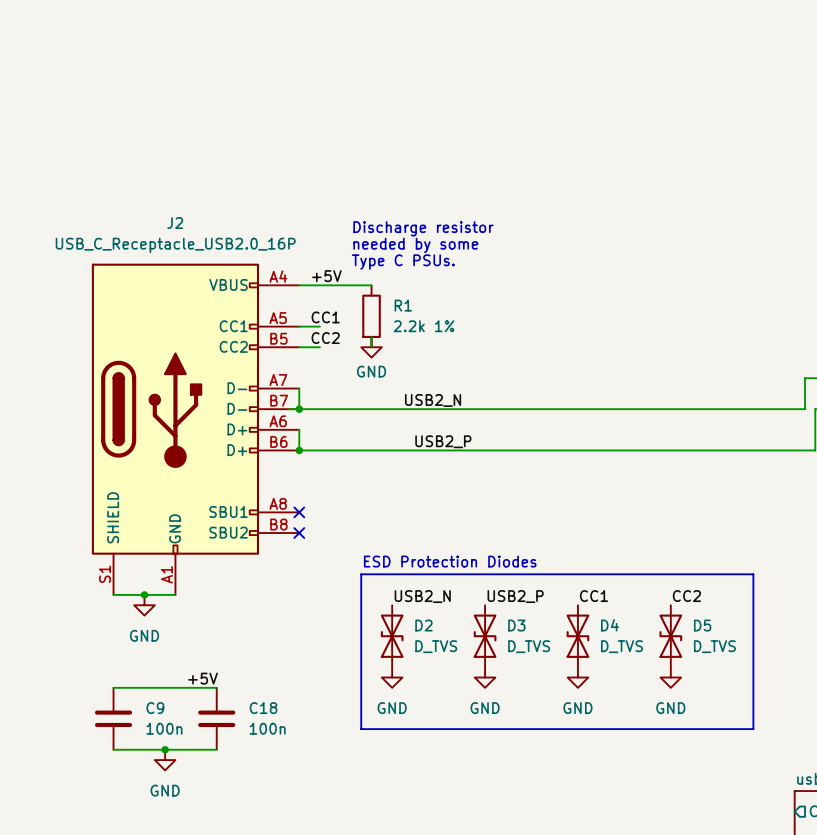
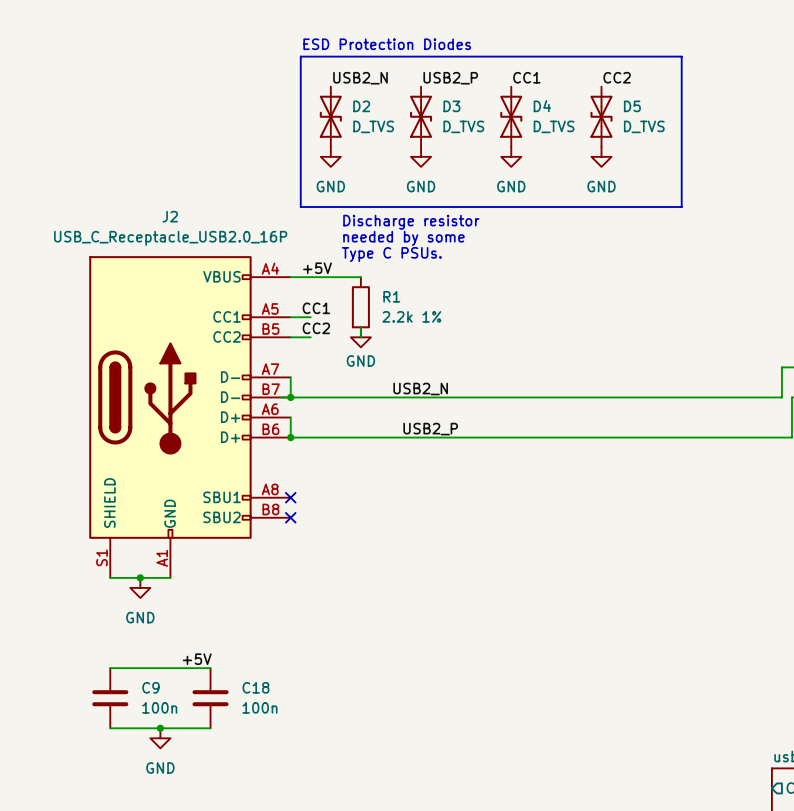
text: none -> ESD Protection Diodes (387, 44)
line: none -> (300, 56) (681, 56) (681, 206) (300, 206) (300, 56)
label: none -> USB2_N (360, 78)
label: none -> USB2_P (450, 78)
label: none -> CC1 (526, 77)
label: none -> CC2 (617, 77)
power symbol: none -> GND (330, 156)
power symbol: none -> GND (421, 156)
power symbol: none -> GND (511, 156)
power symbol: none -> GND (601, 156)
text: ESD Protection Diodes (450, 561) -> none
line: (361, 574) (753, 574) (753, 729) (361, 729) (361, 574) -> none
label: USB2_N (422, 596) -> none
label: USB2_P (515, 596) -> none
label: CC1 (593, 596) -> none
label: CC2 (686, 596) -> none
D2 position: (392, 636) -> (330, 116)
D3 position: (485, 636) -> (421, 116)
D4 position: (577, 636) -> (511, 116)
D5 position: (670, 636) -> (601, 116)
power symbol: GND (392, 677) -> none
power symbol: GND (485, 677) -> none
power symbol: GND (577, 677) -> none
power symbol: GND (670, 677) -> none

